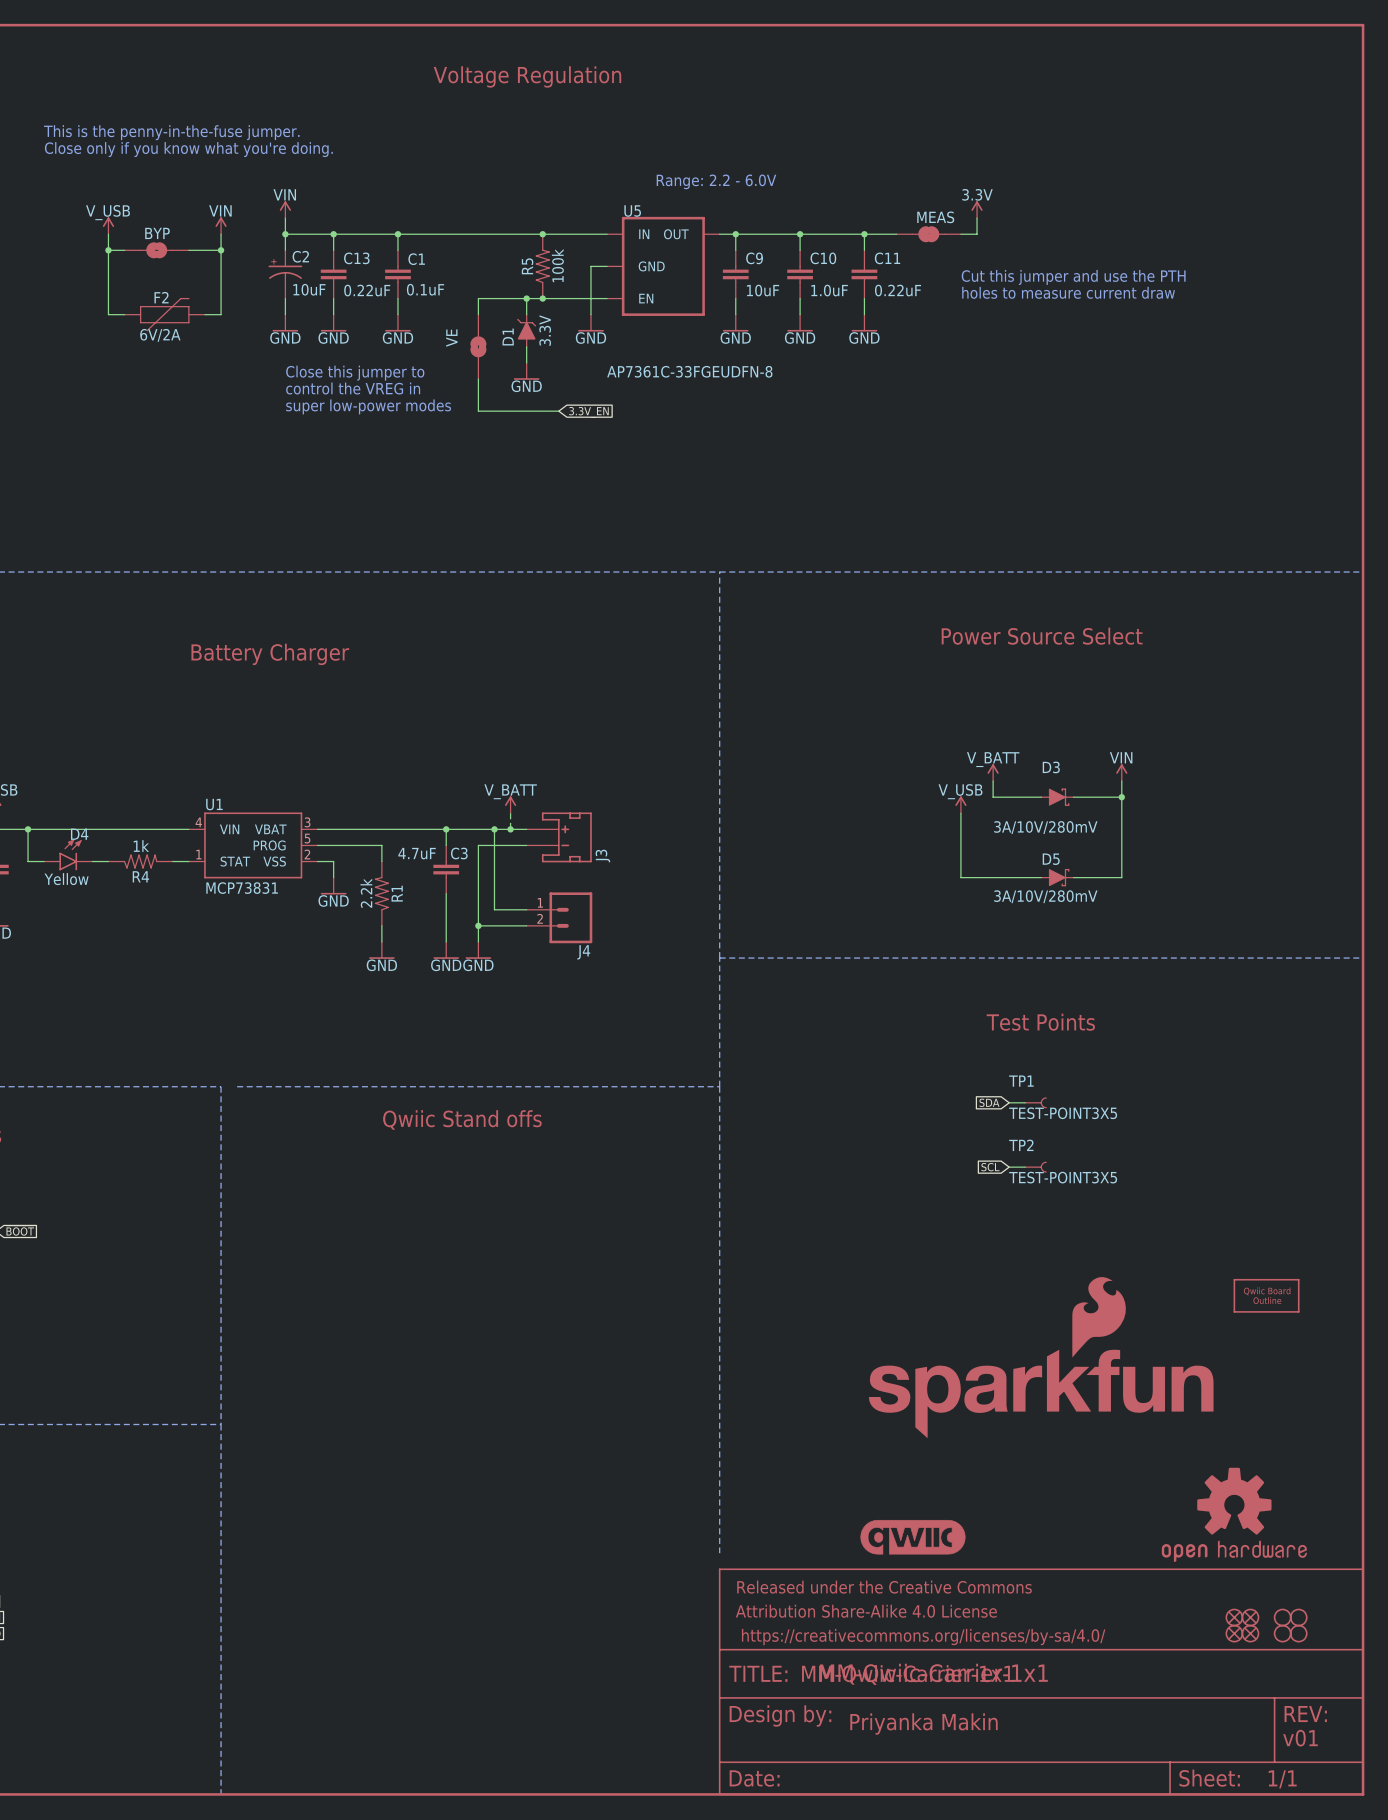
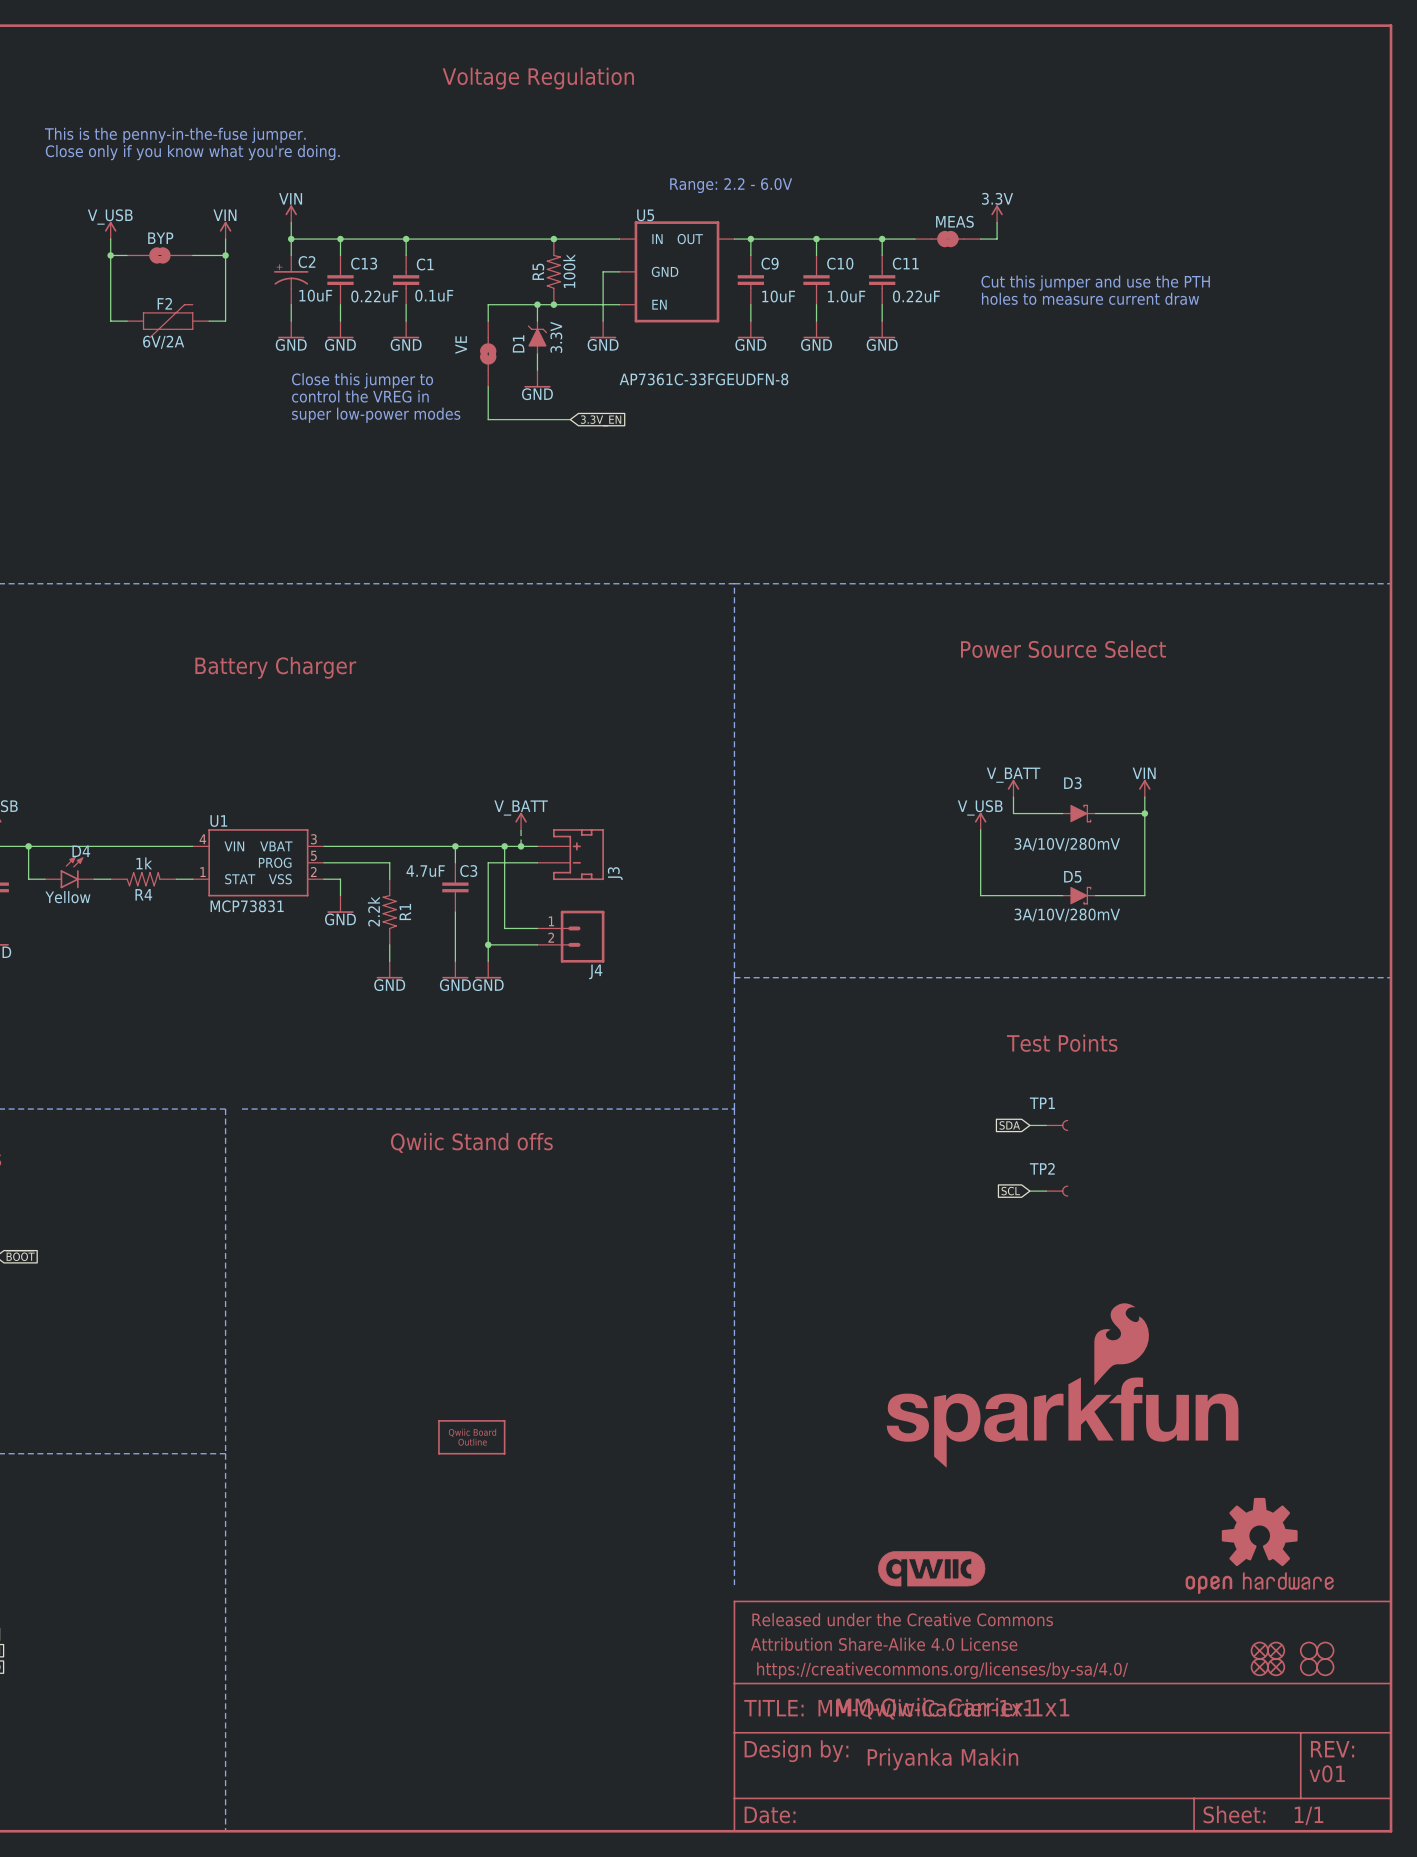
TP1 value: TEST-POINT3X5 (1063, 1113) -> none
TP2 value: TEST-POINT3X5 (1063, 1177) -> none
part: (1266, 1295) -> none
part: none -> (471, 1437)

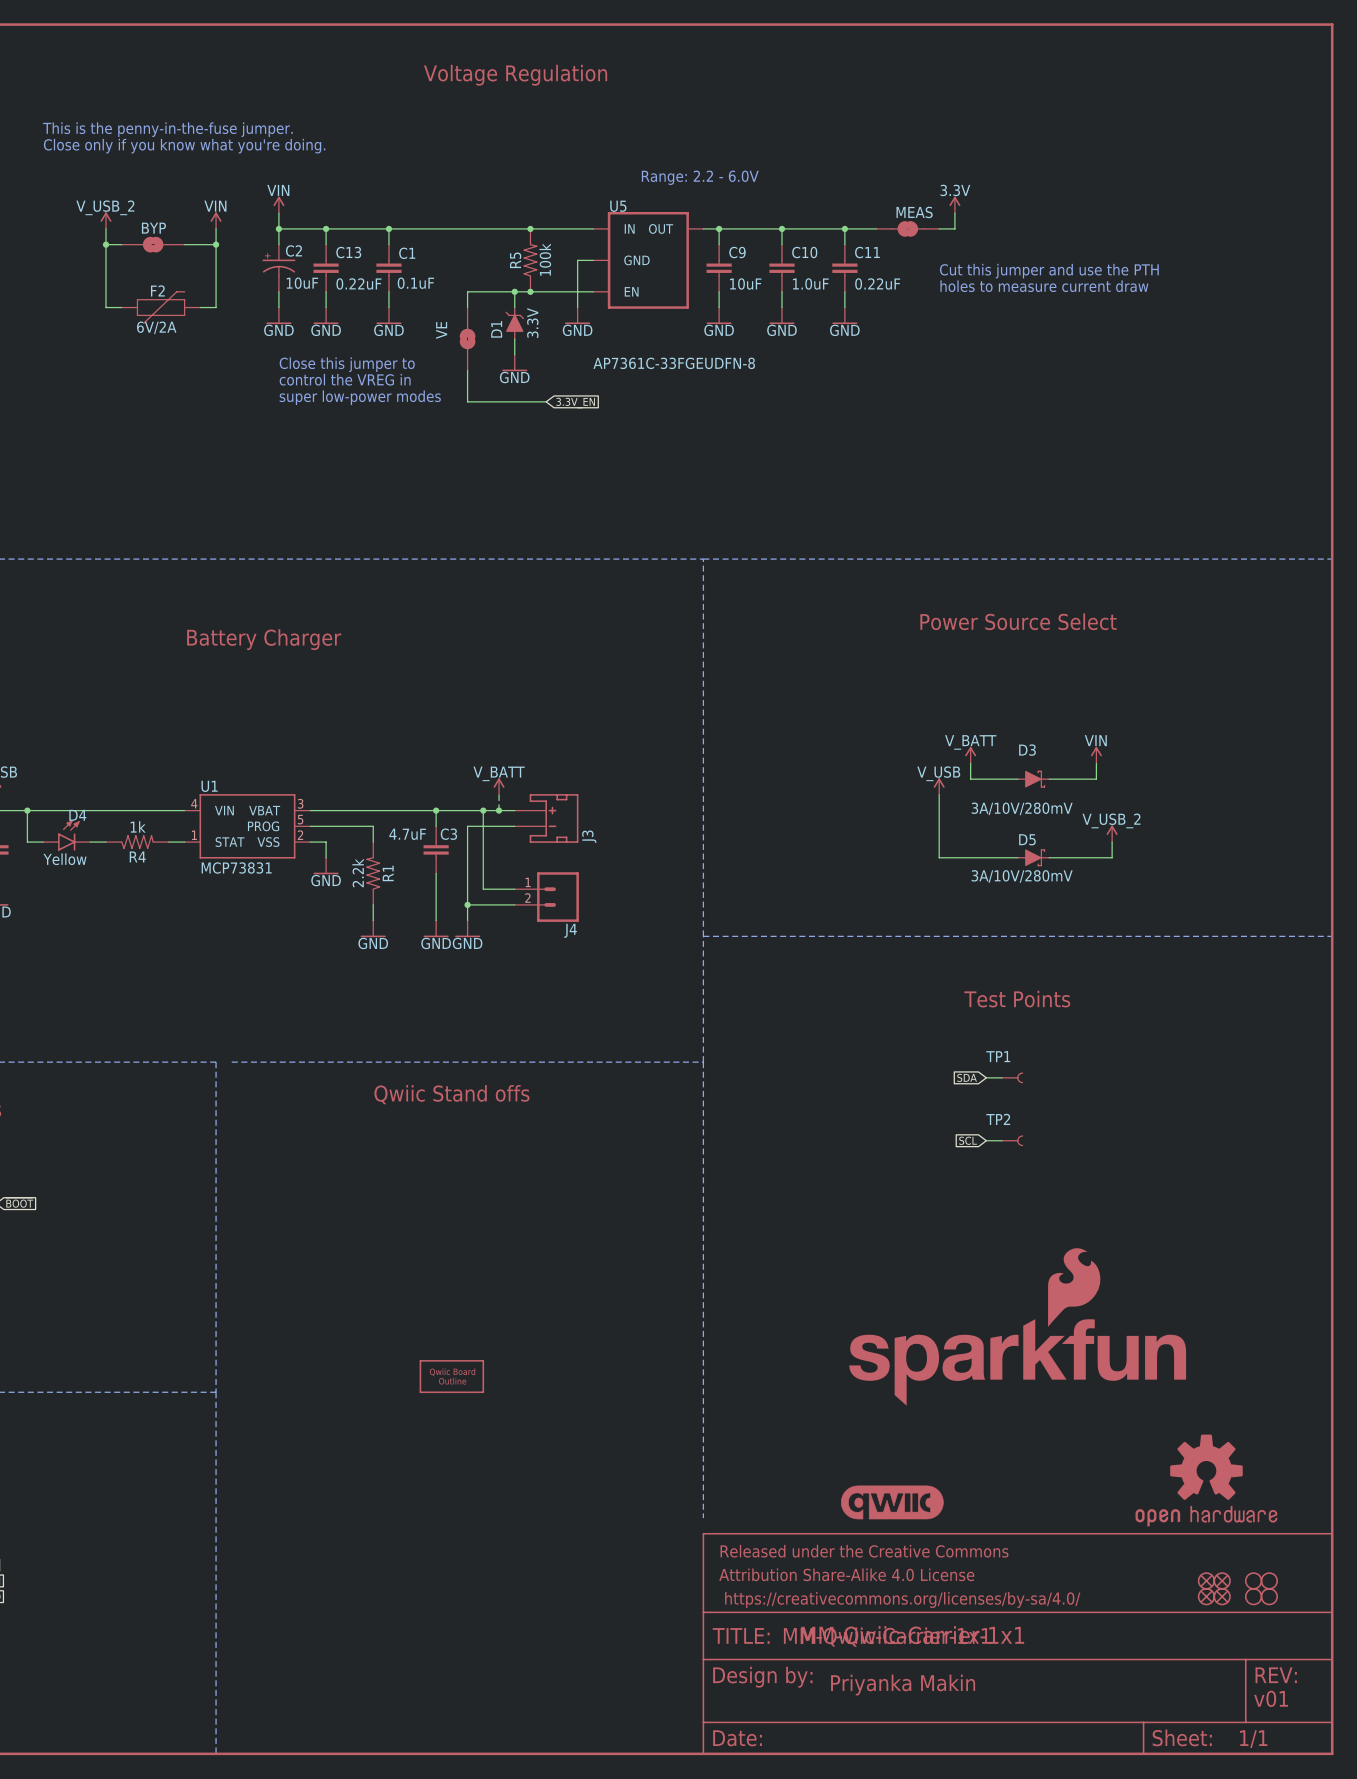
power symbol: V_USB (110, 230) -> V_USB_2 (106, 220)
wire: (1144, 813) (1144, 895) -> (1112, 842) (1112, 857) (1096, 857)
junction: (1144, 813) -> none
power symbol: none -> V_USB_2 (1112, 833)

